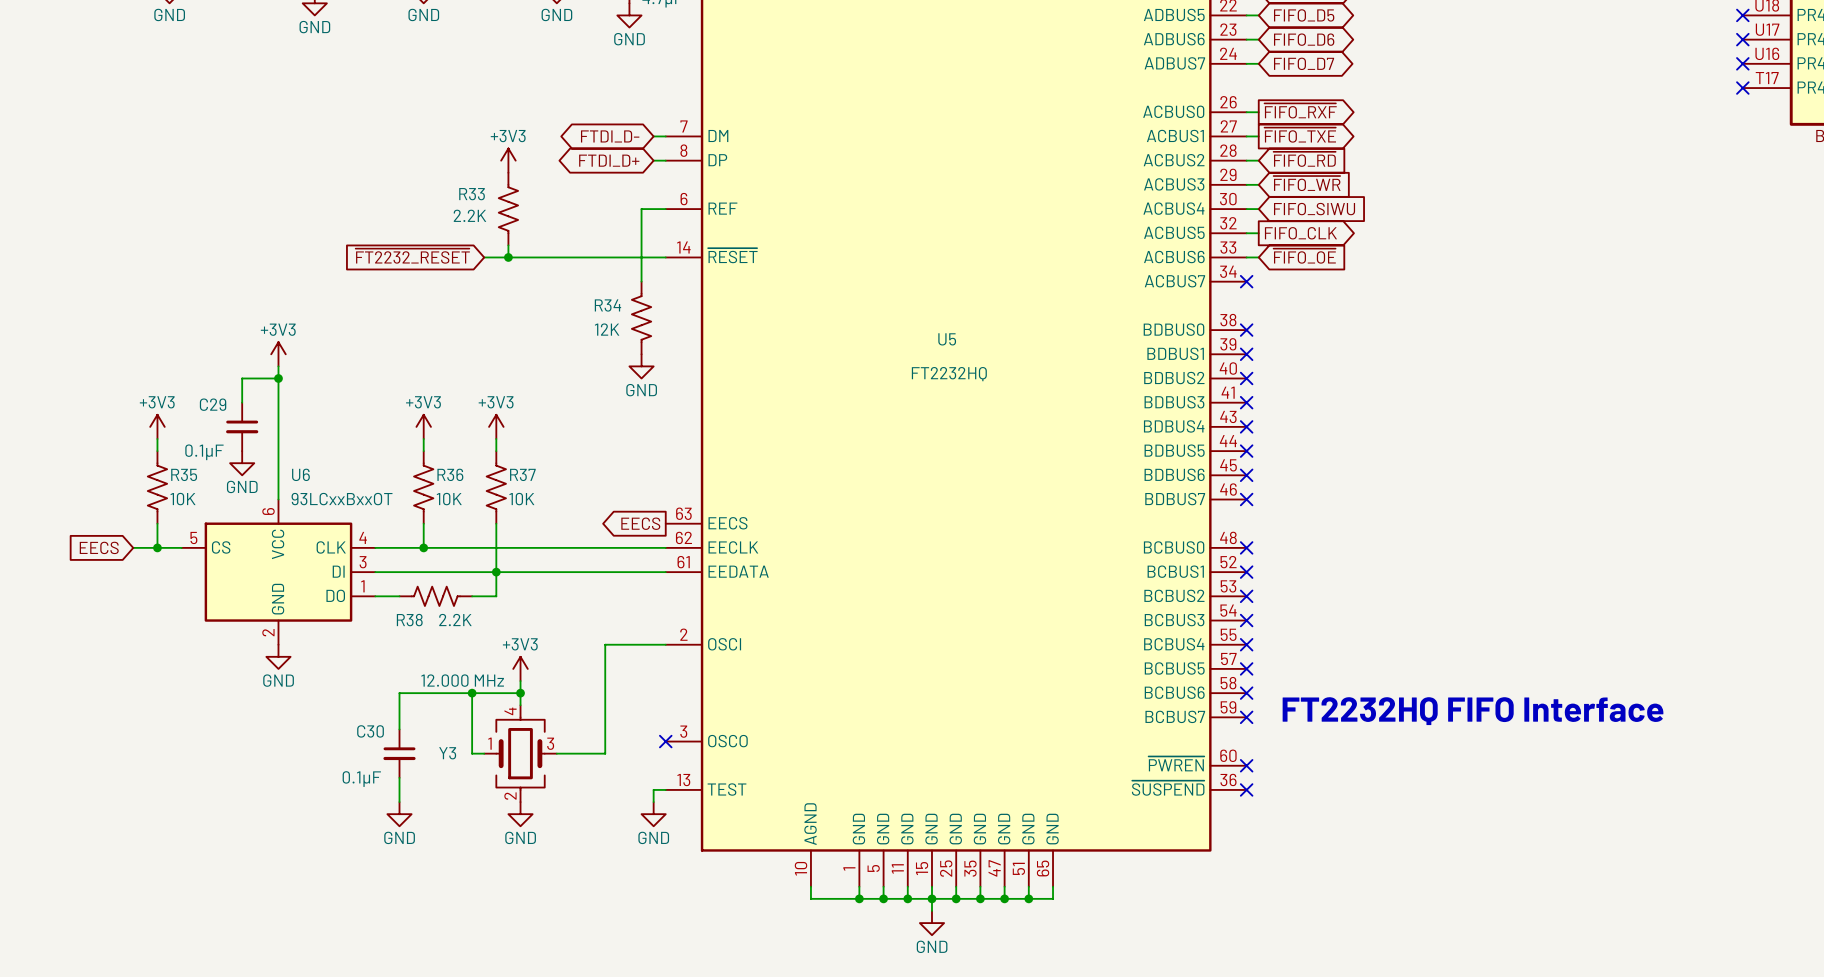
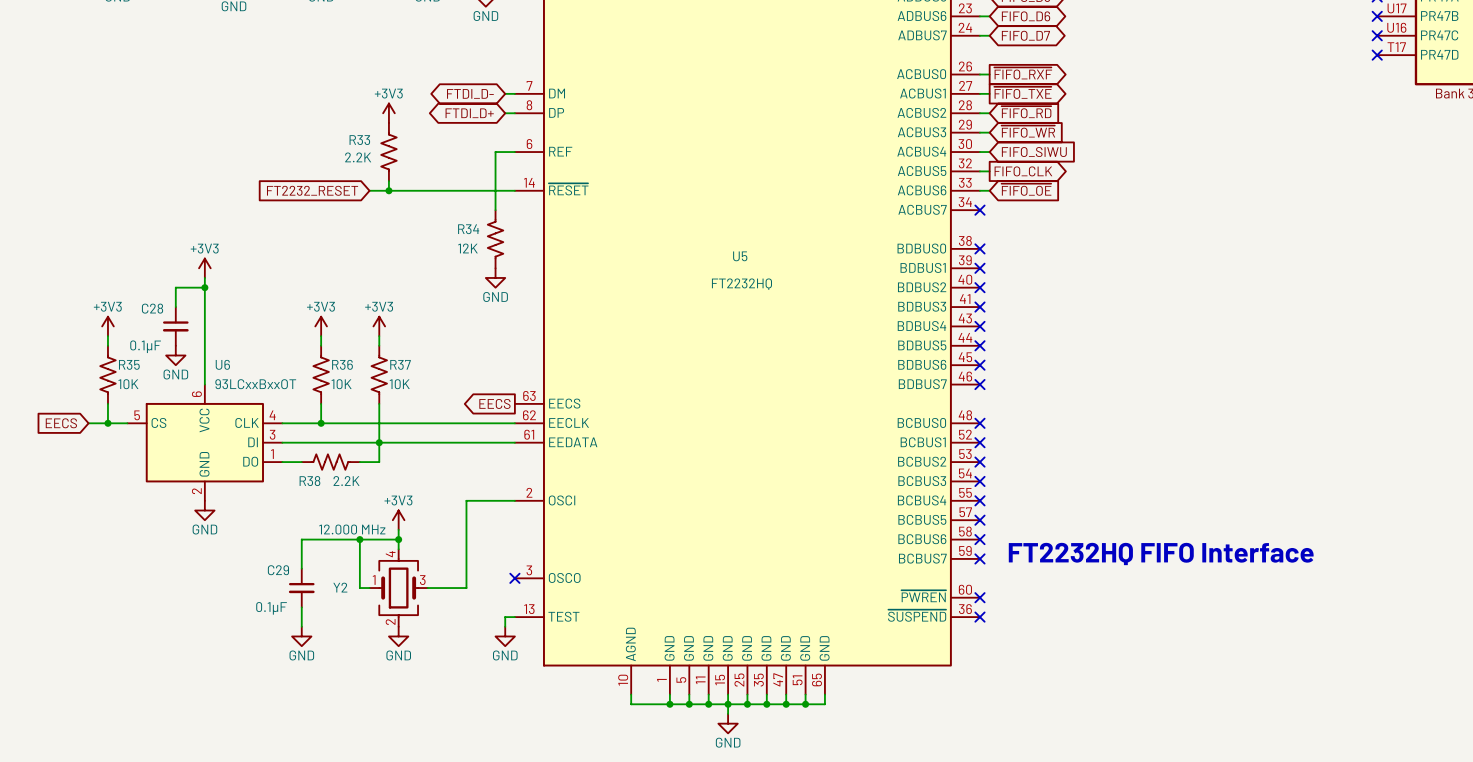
global label: ~{FT2232_RESET} (412, 256) -> FT2232_RESET (312, 190)
C29 name: C29 (213, 404) -> C28 (152, 308)
C30 name: C30 (370, 731) -> C29 (278, 570)
Y3 name: Y3 (447, 753) -> Y2 (340, 587)

